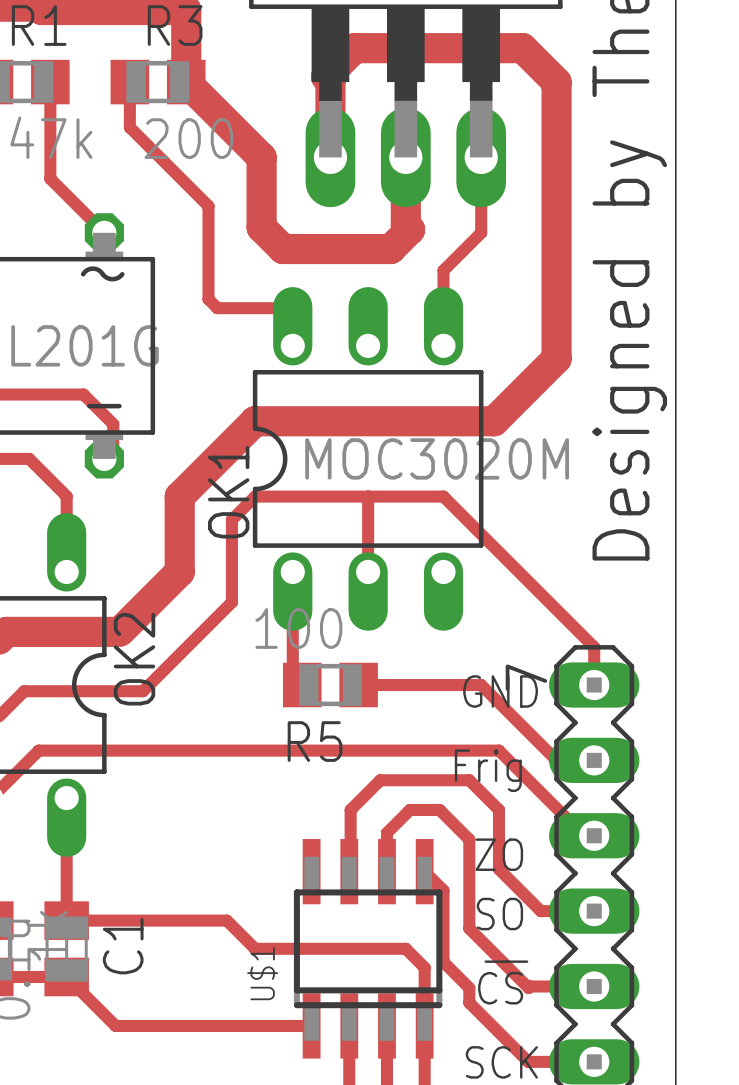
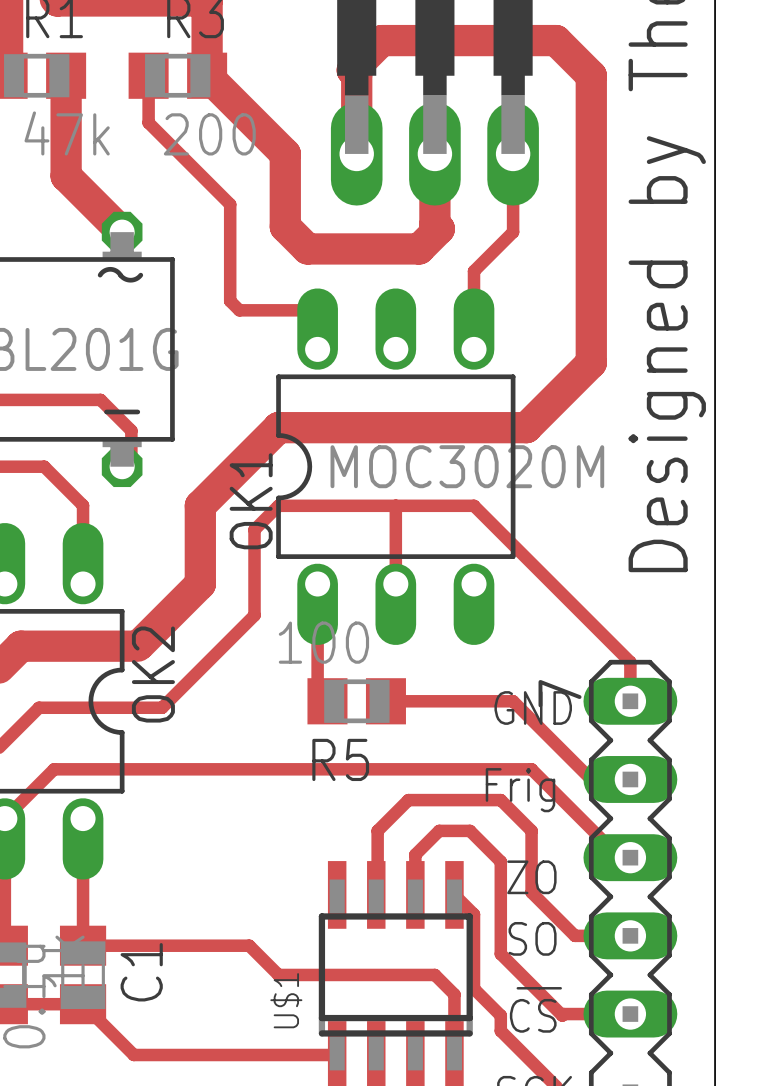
top track width: thin (50, 82) (50, 178) (104, 232) -> thick (66, 75) (66, 176) (122, 232)

